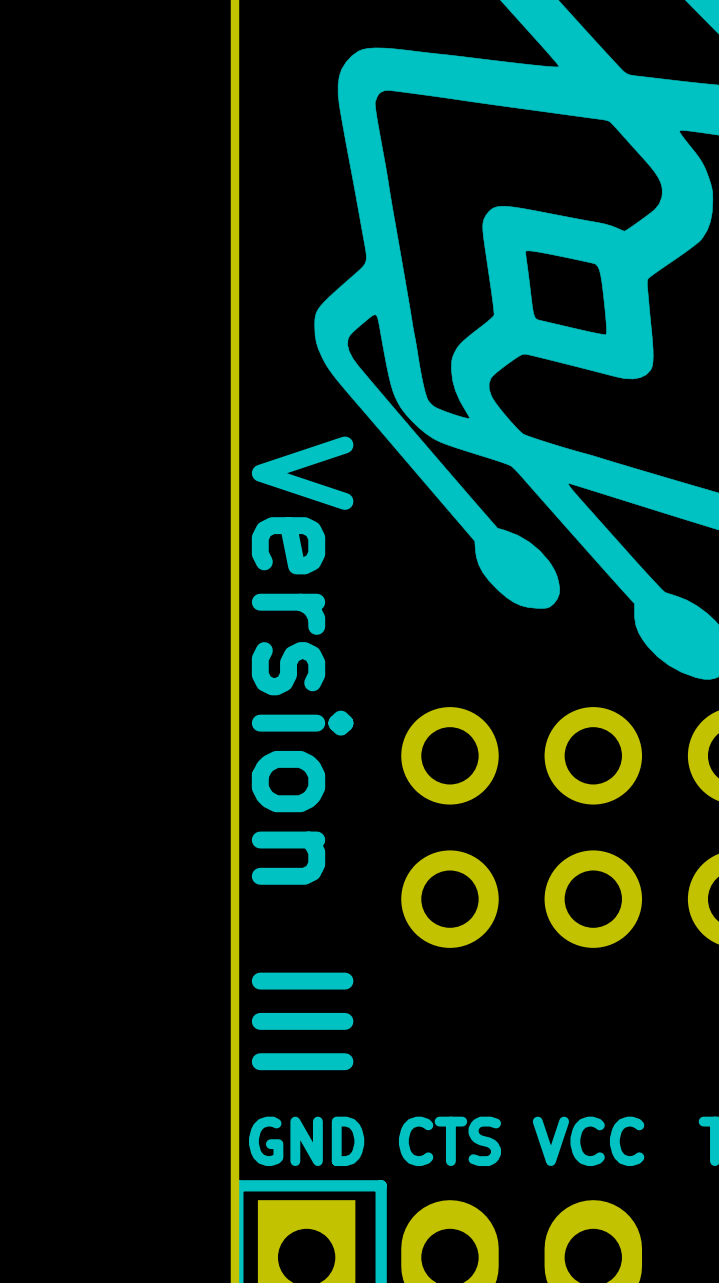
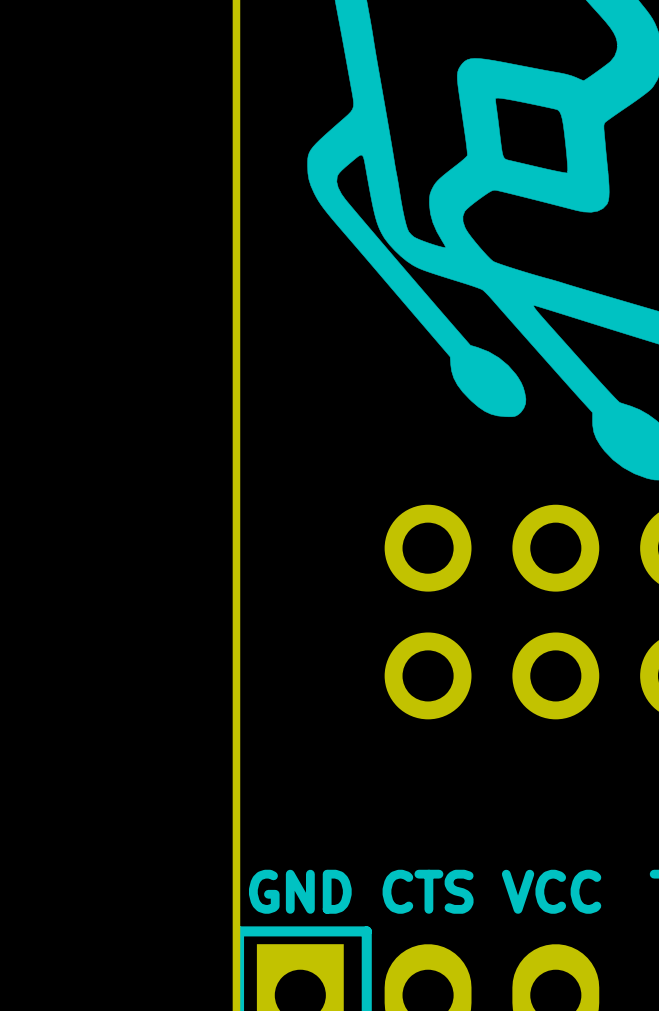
text: Version III (302, 753) -> none

